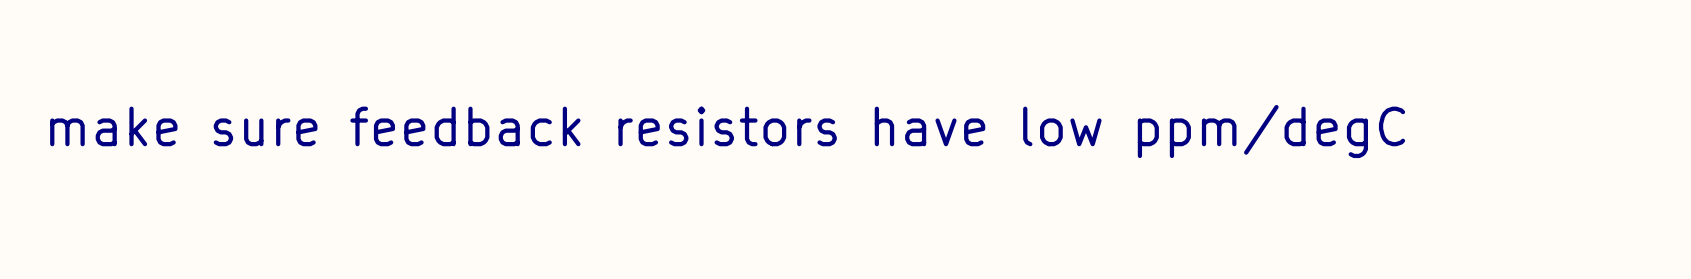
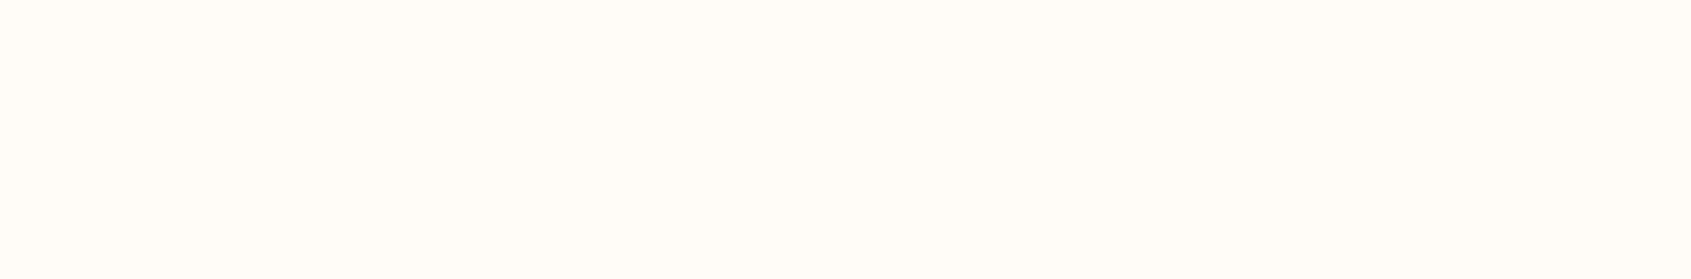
text: make sure feedback resistors have low ppm/degC (727, 131) -> none

